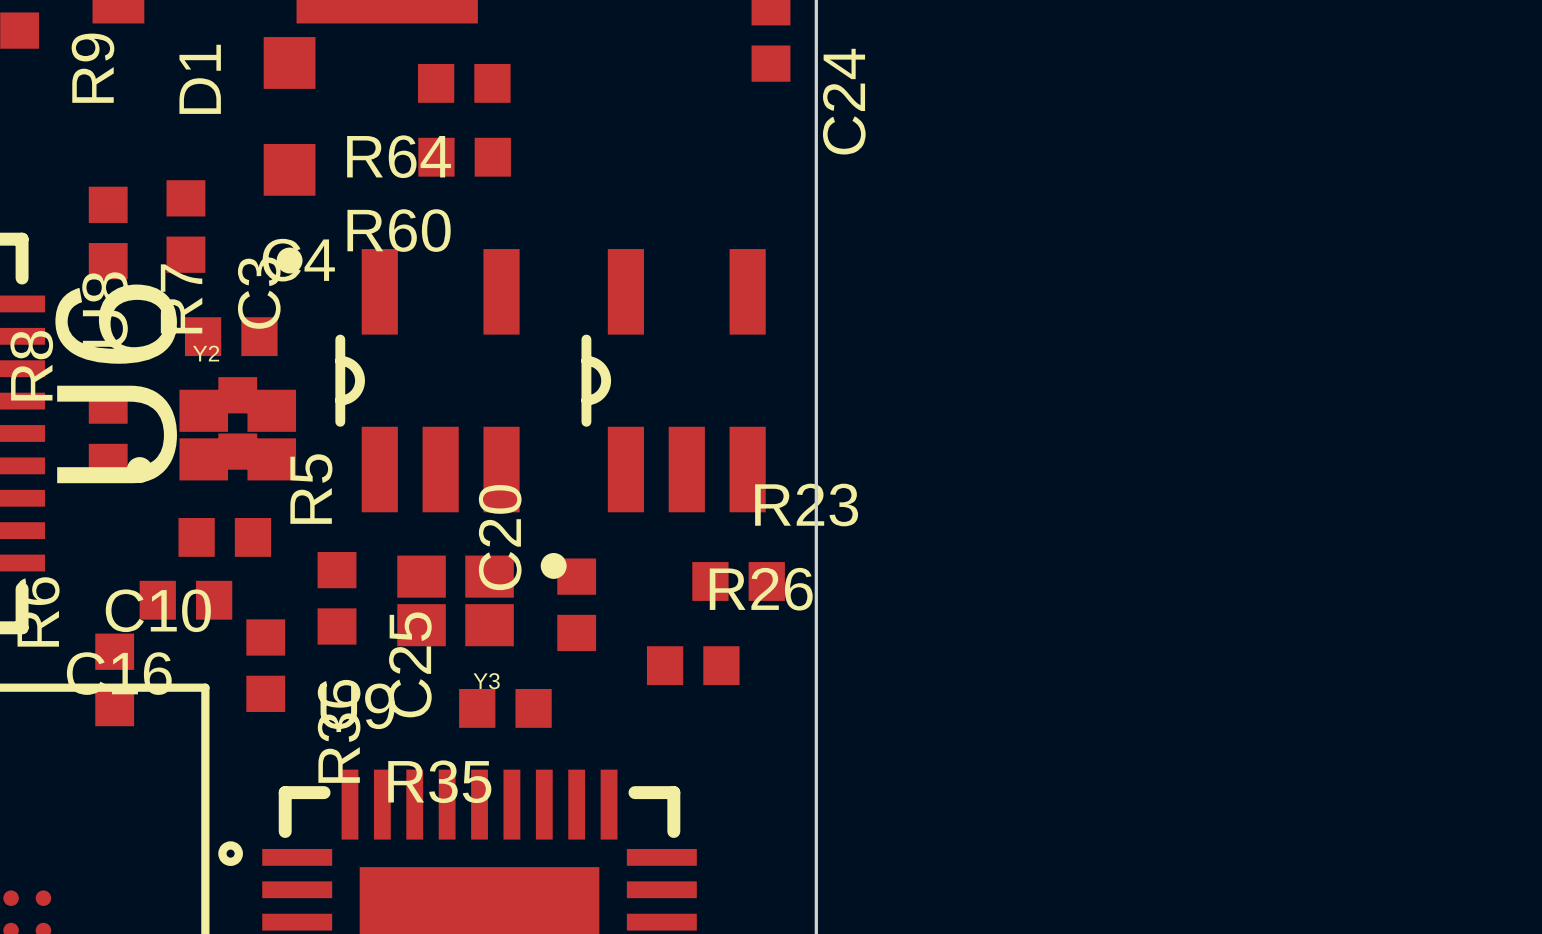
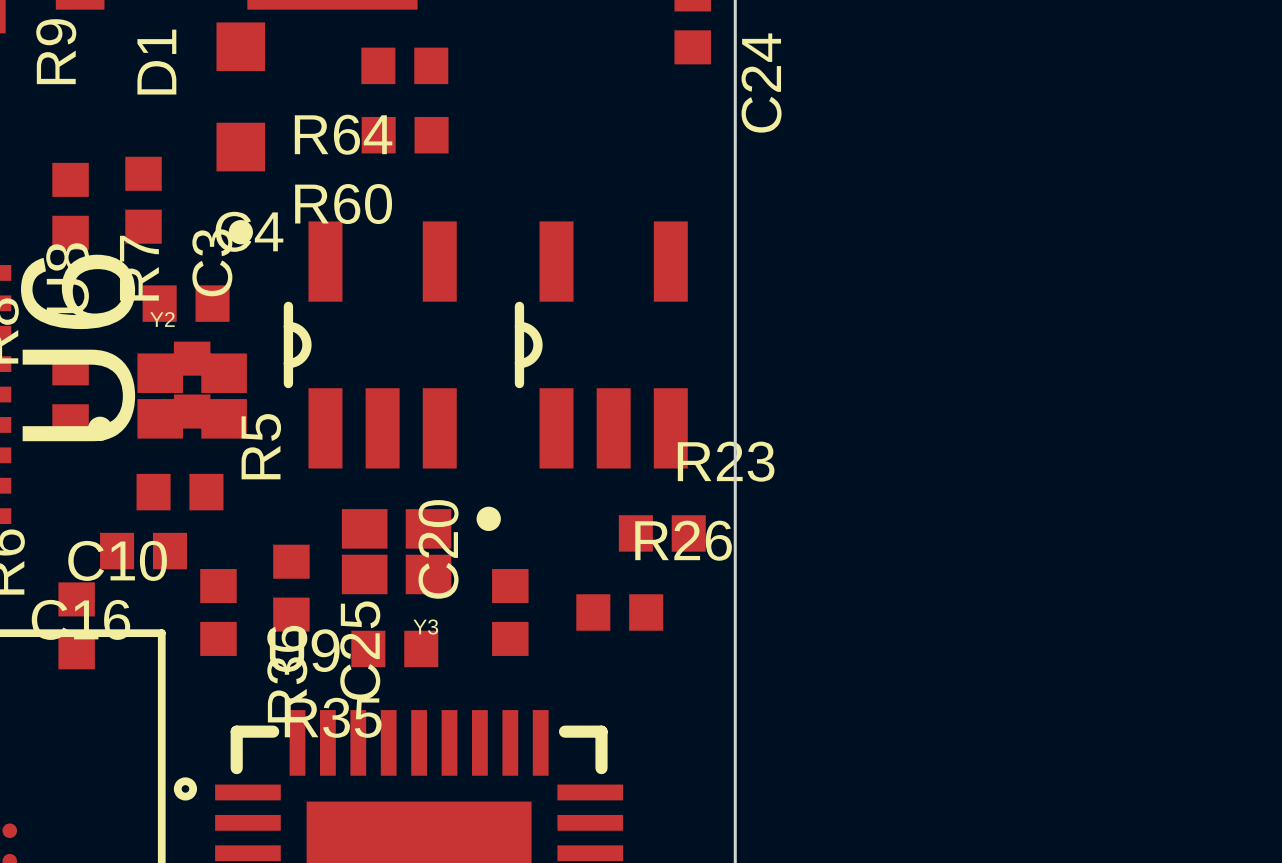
C25 position: (337, 598) -> (291, 588)
C20 position: (576, 604) -> (510, 612)
R35 position: (505, 708) -> (394, 648)

